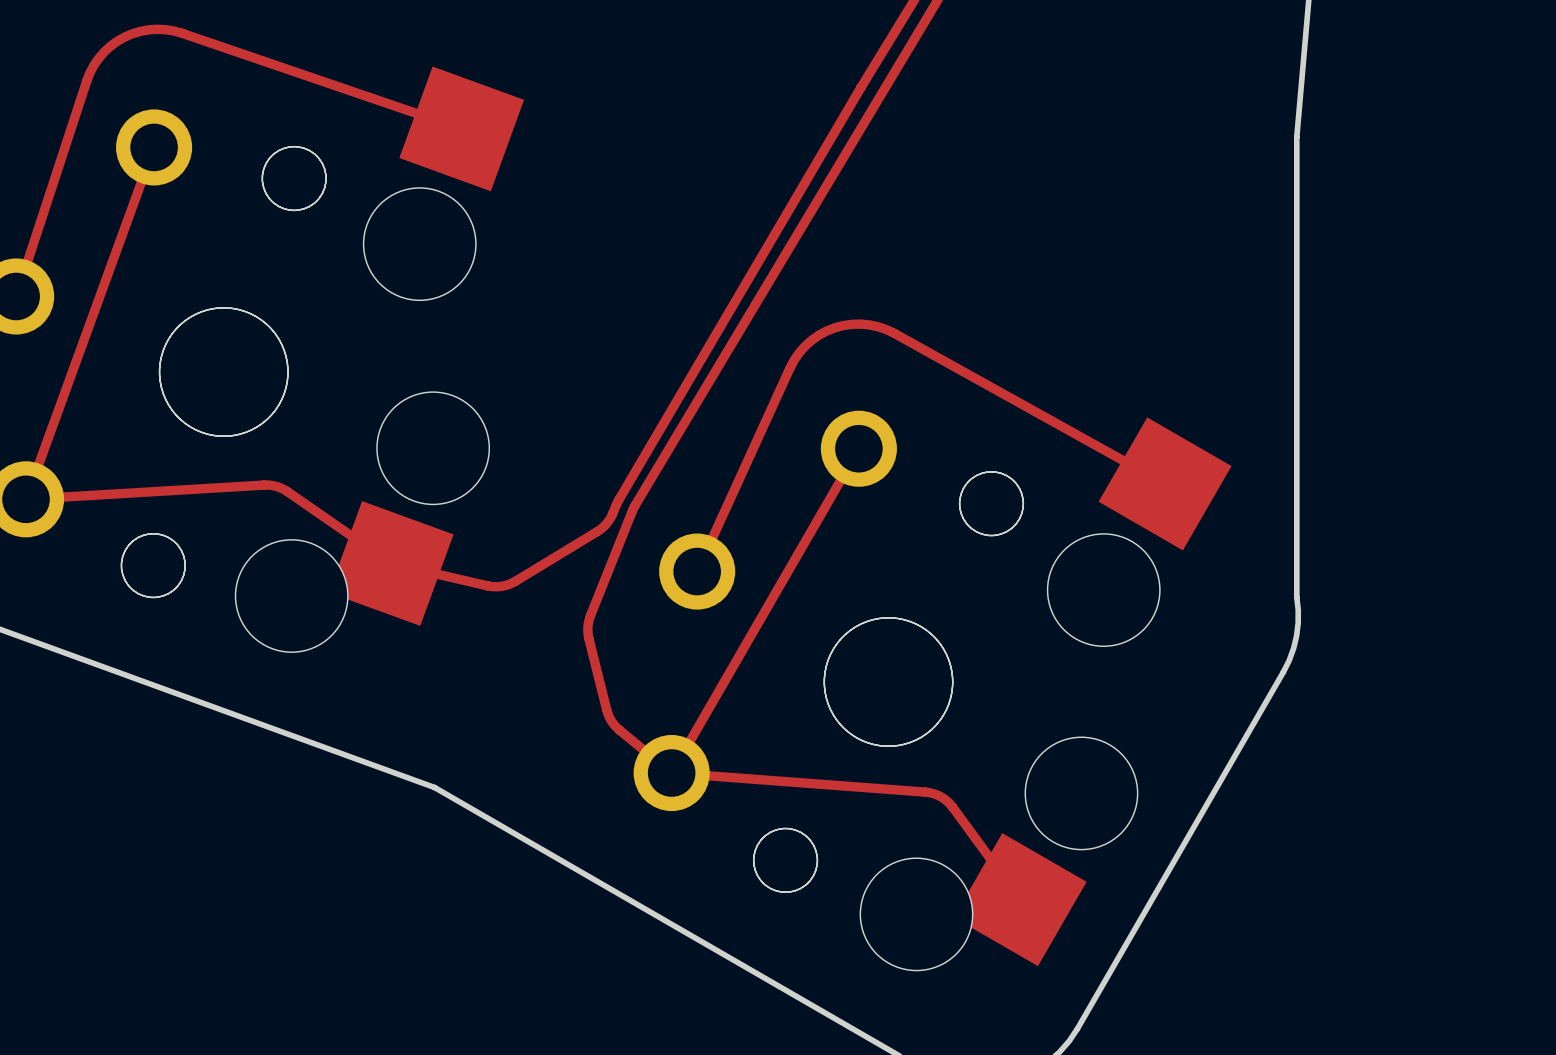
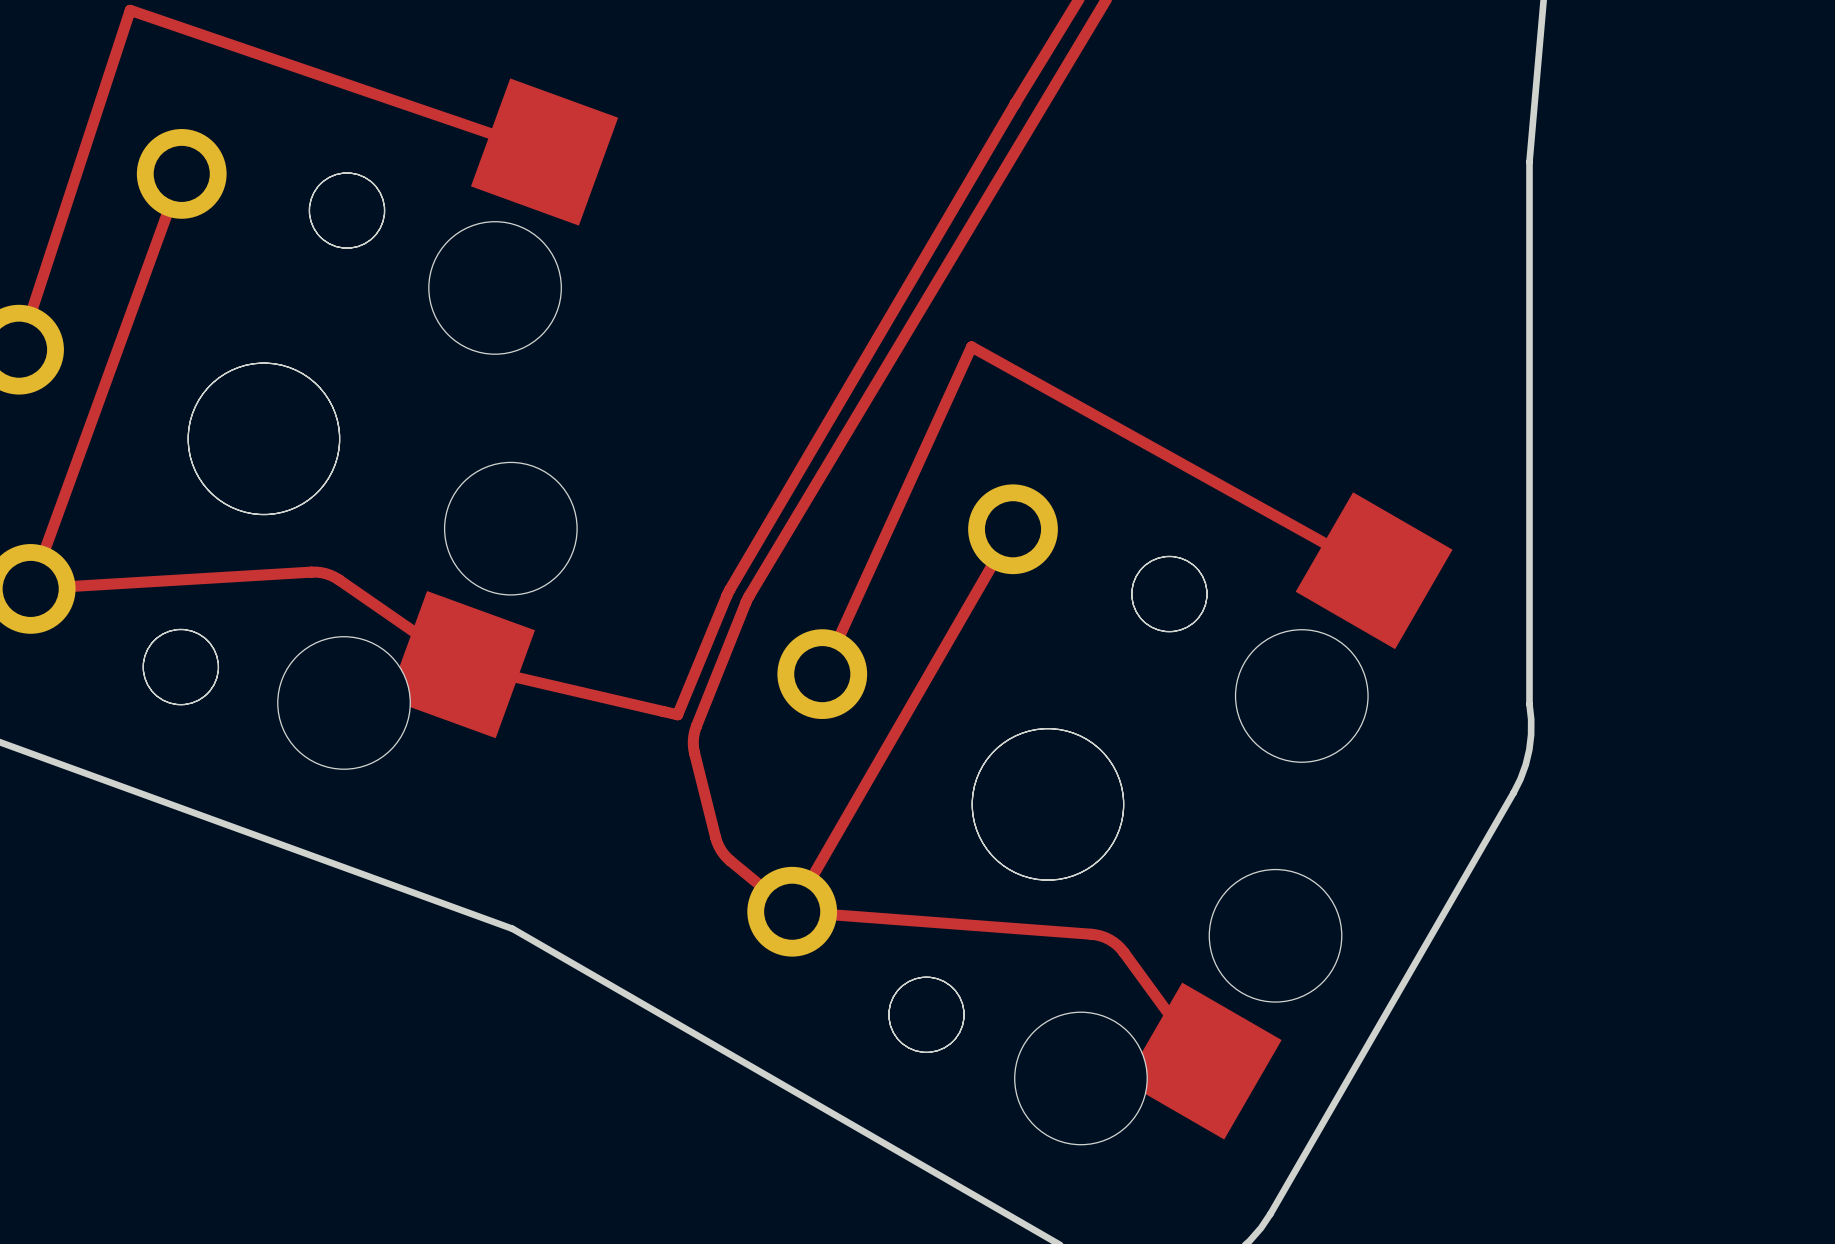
track: (182, 33) (165, 29) (148, 29) (124, 37) (110, 46) (98, 58) (86, 80) -> (214, 39) (130, 10) (102, 95)
track: (894, 333) (869, 324) (852, 324) (834, 327) (811, 340) (799, 352) (790, 367) -> (1055, 393) (971, 346) (931, 433)
track: (612, 513) (600, 529) (515, 581) (501, 586) (487, 585) -> (722, 605) (677, 714) (574, 690)

